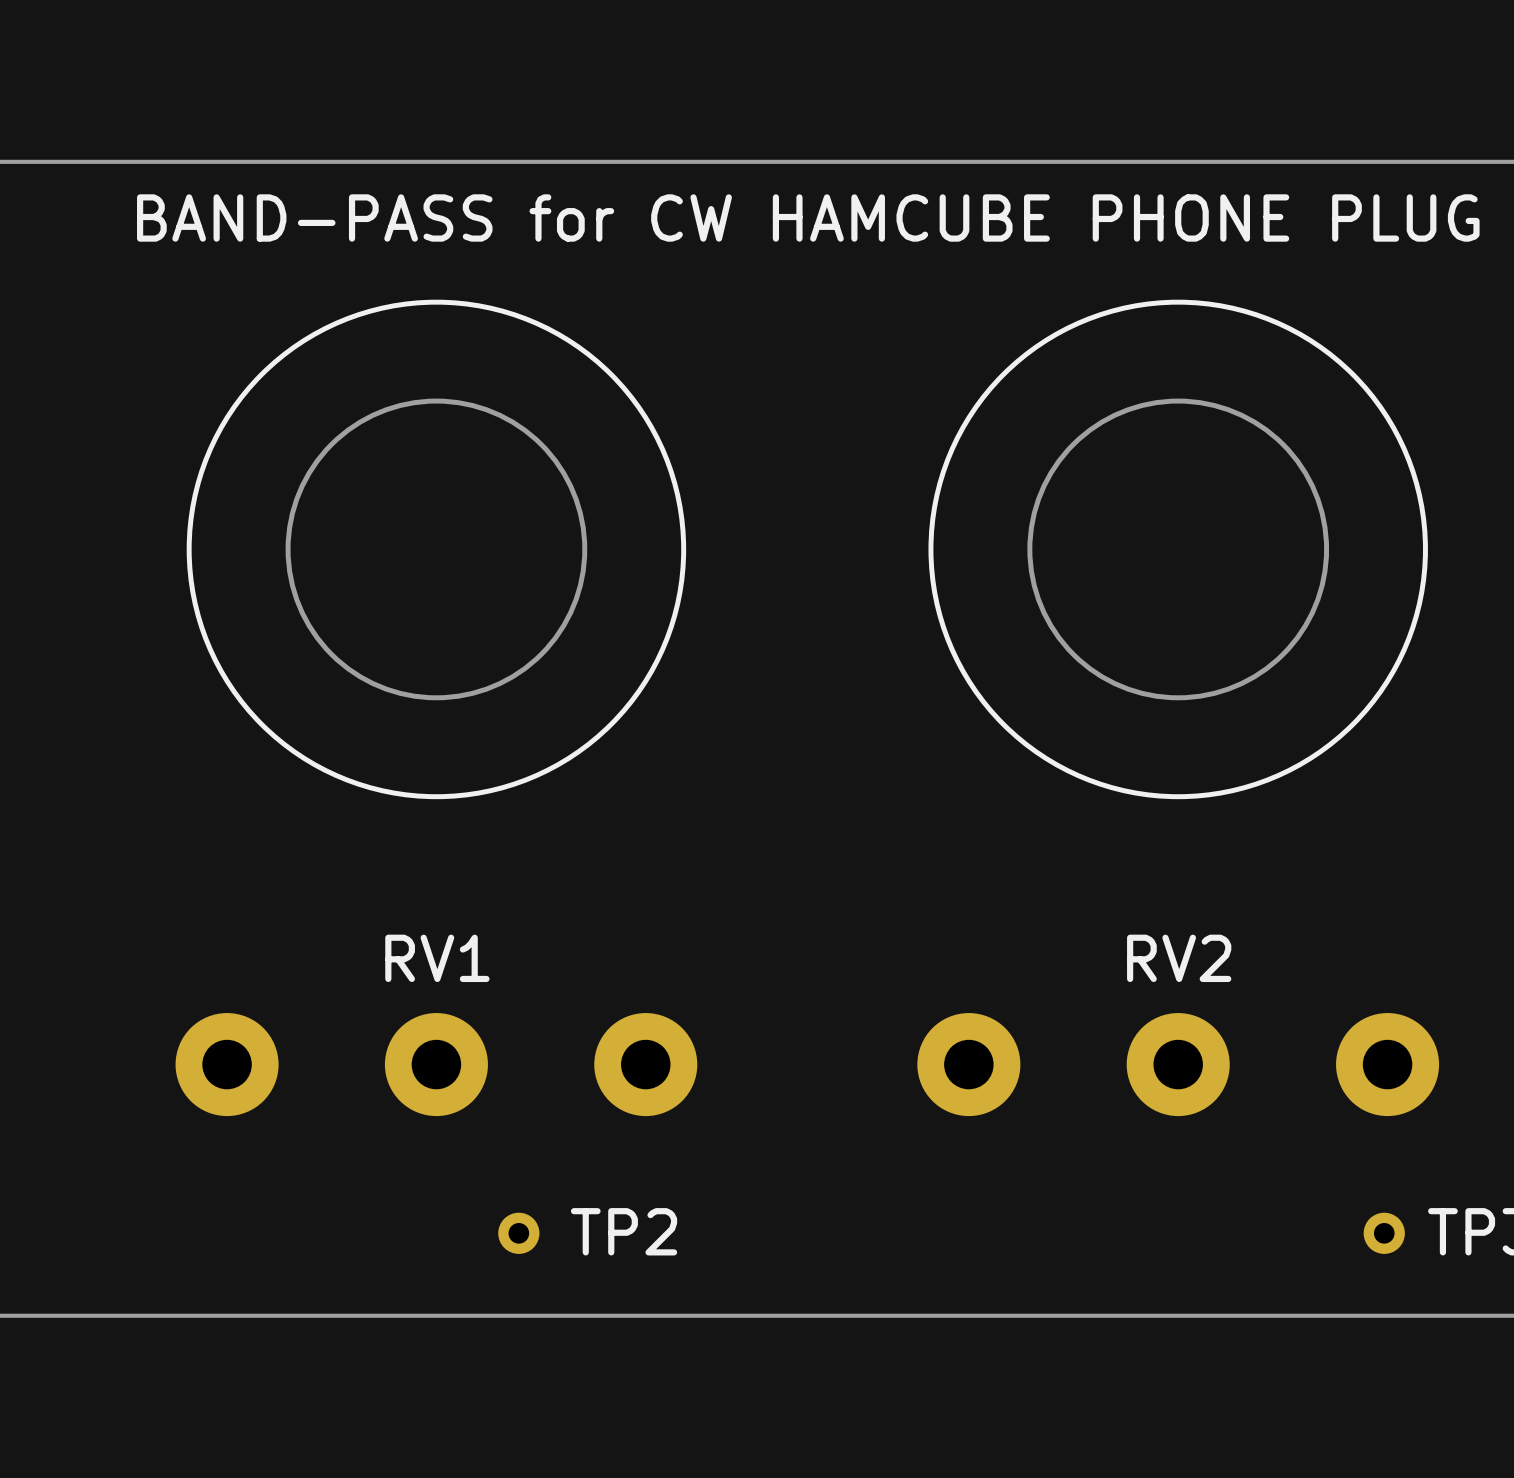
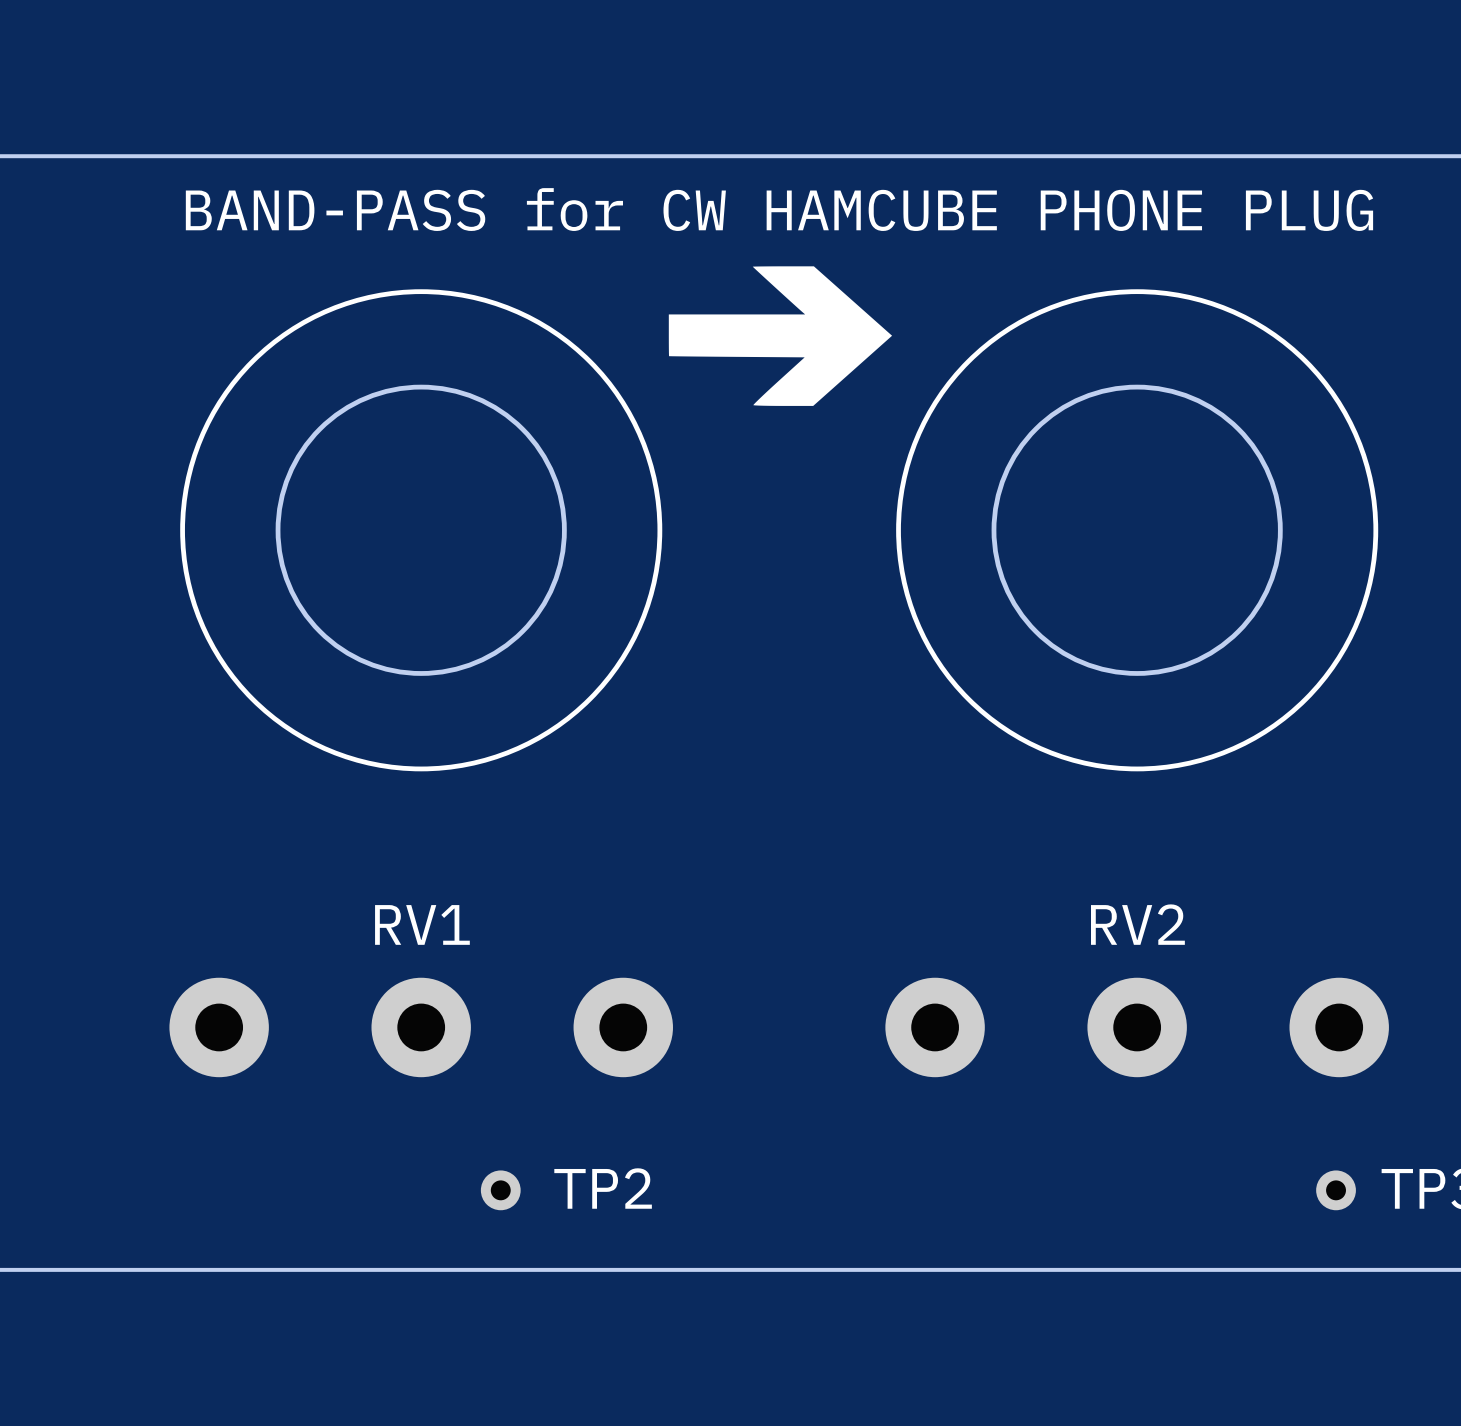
drawing: none -> [668, 266, 893, 406]

